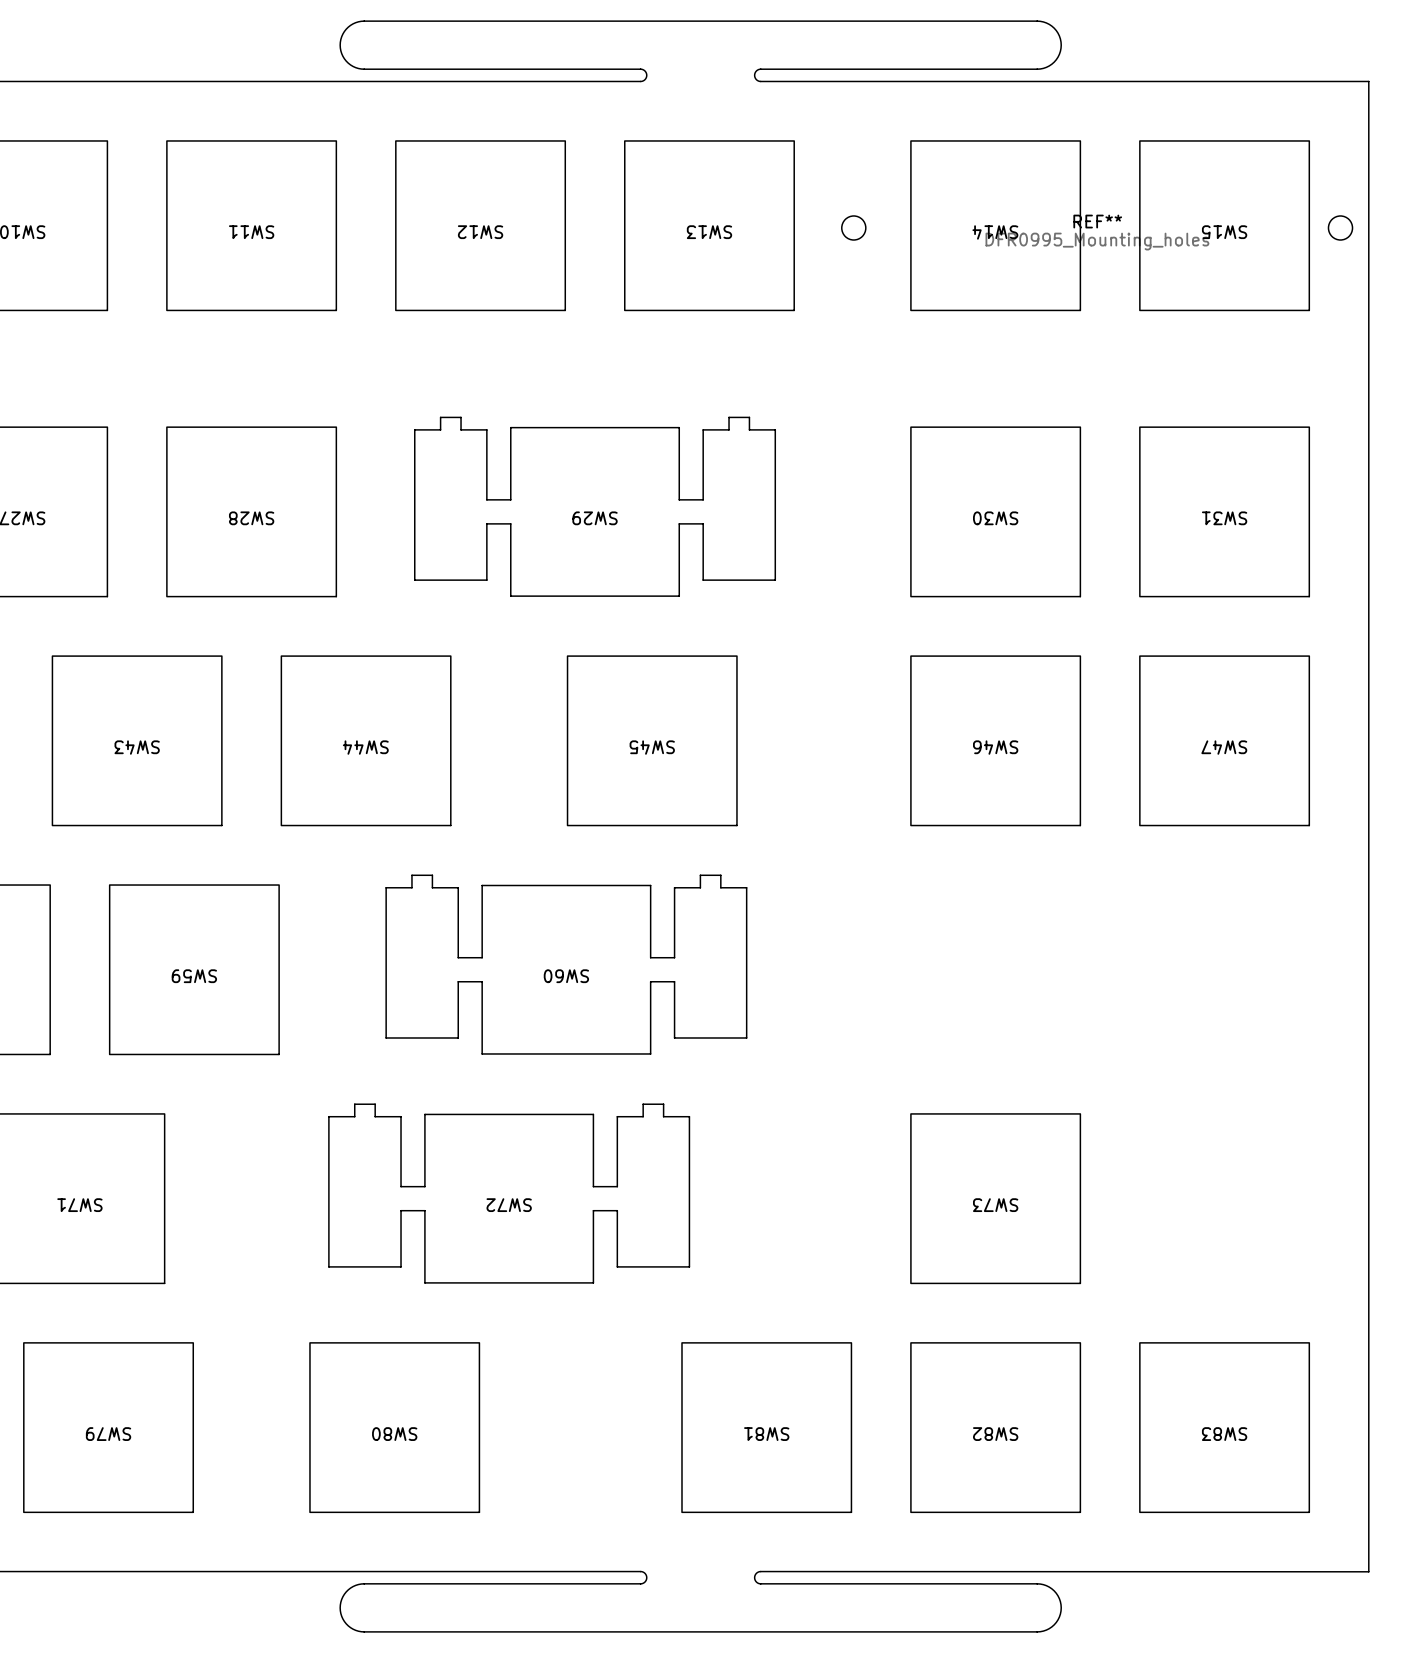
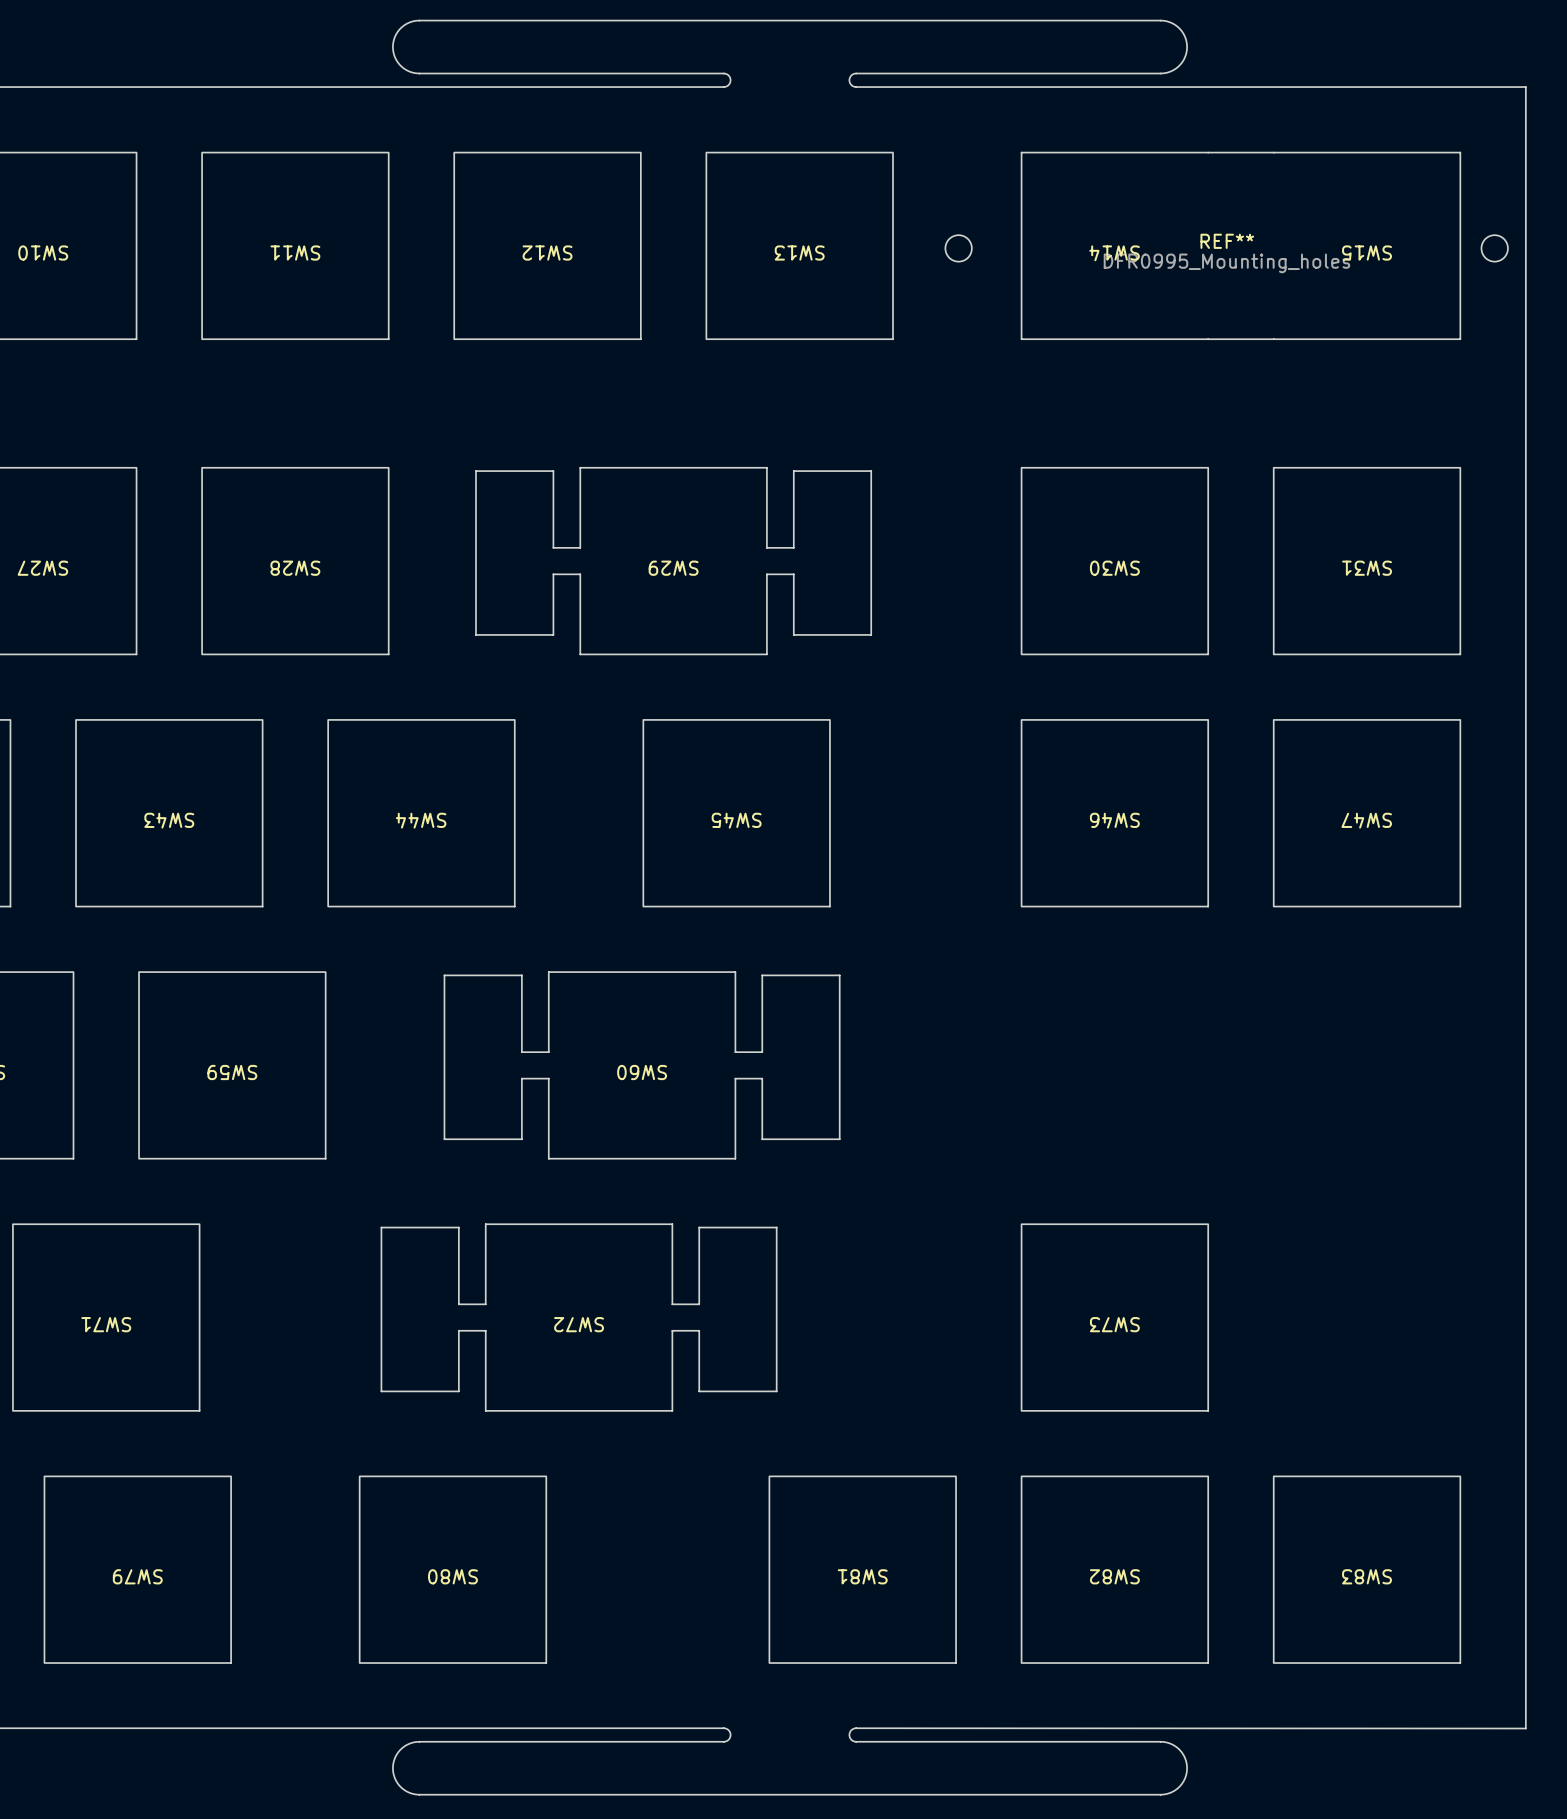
SW14 footprint: [910, 140, 1082, 312] -> [1020, 151, 1209, 341]
board edge: none -> (1208, 152) (1273, 152)
SW15 footprint: [1139, 140, 1311, 312] -> [1272, 151, 1462, 341]
board edge: none -> (1208, 339) (1273, 339)
SW29 footprint: [414, 416, 777, 597] -> [475, 466, 873, 656]
SW60 footprint: [385, 874, 748, 1055] -> [443, 971, 841, 1160]
SW72 footprint: [328, 1103, 691, 1284] -> [380, 1223, 778, 1412]

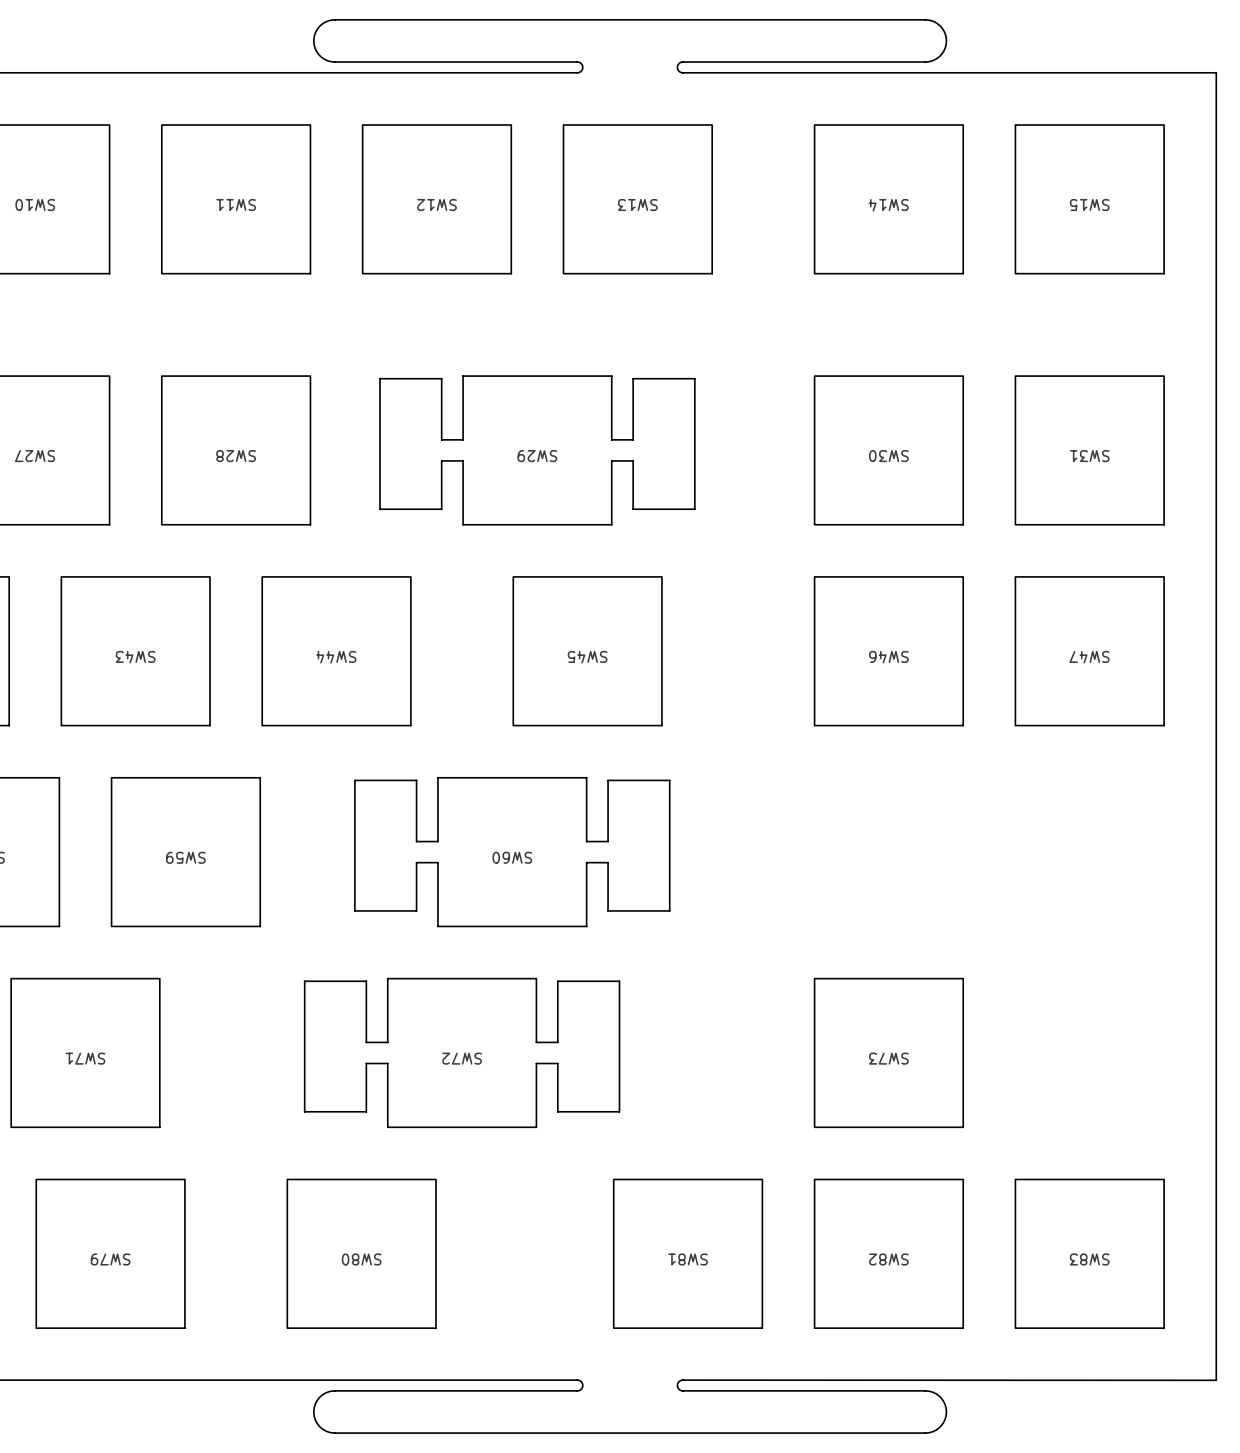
SW14 footprint: [1020, 151, 1209, 341] -> [813, 124, 964, 275]
SW15 footprint: [1272, 151, 1462, 341] -> [1014, 124, 1165, 275]
board edge: (1208, 152) (1273, 152) -> none
REF**: DFR0995_Mounting_holes (1226, 248) -> none
board edge: (1208, 339) (1273, 339) -> none

